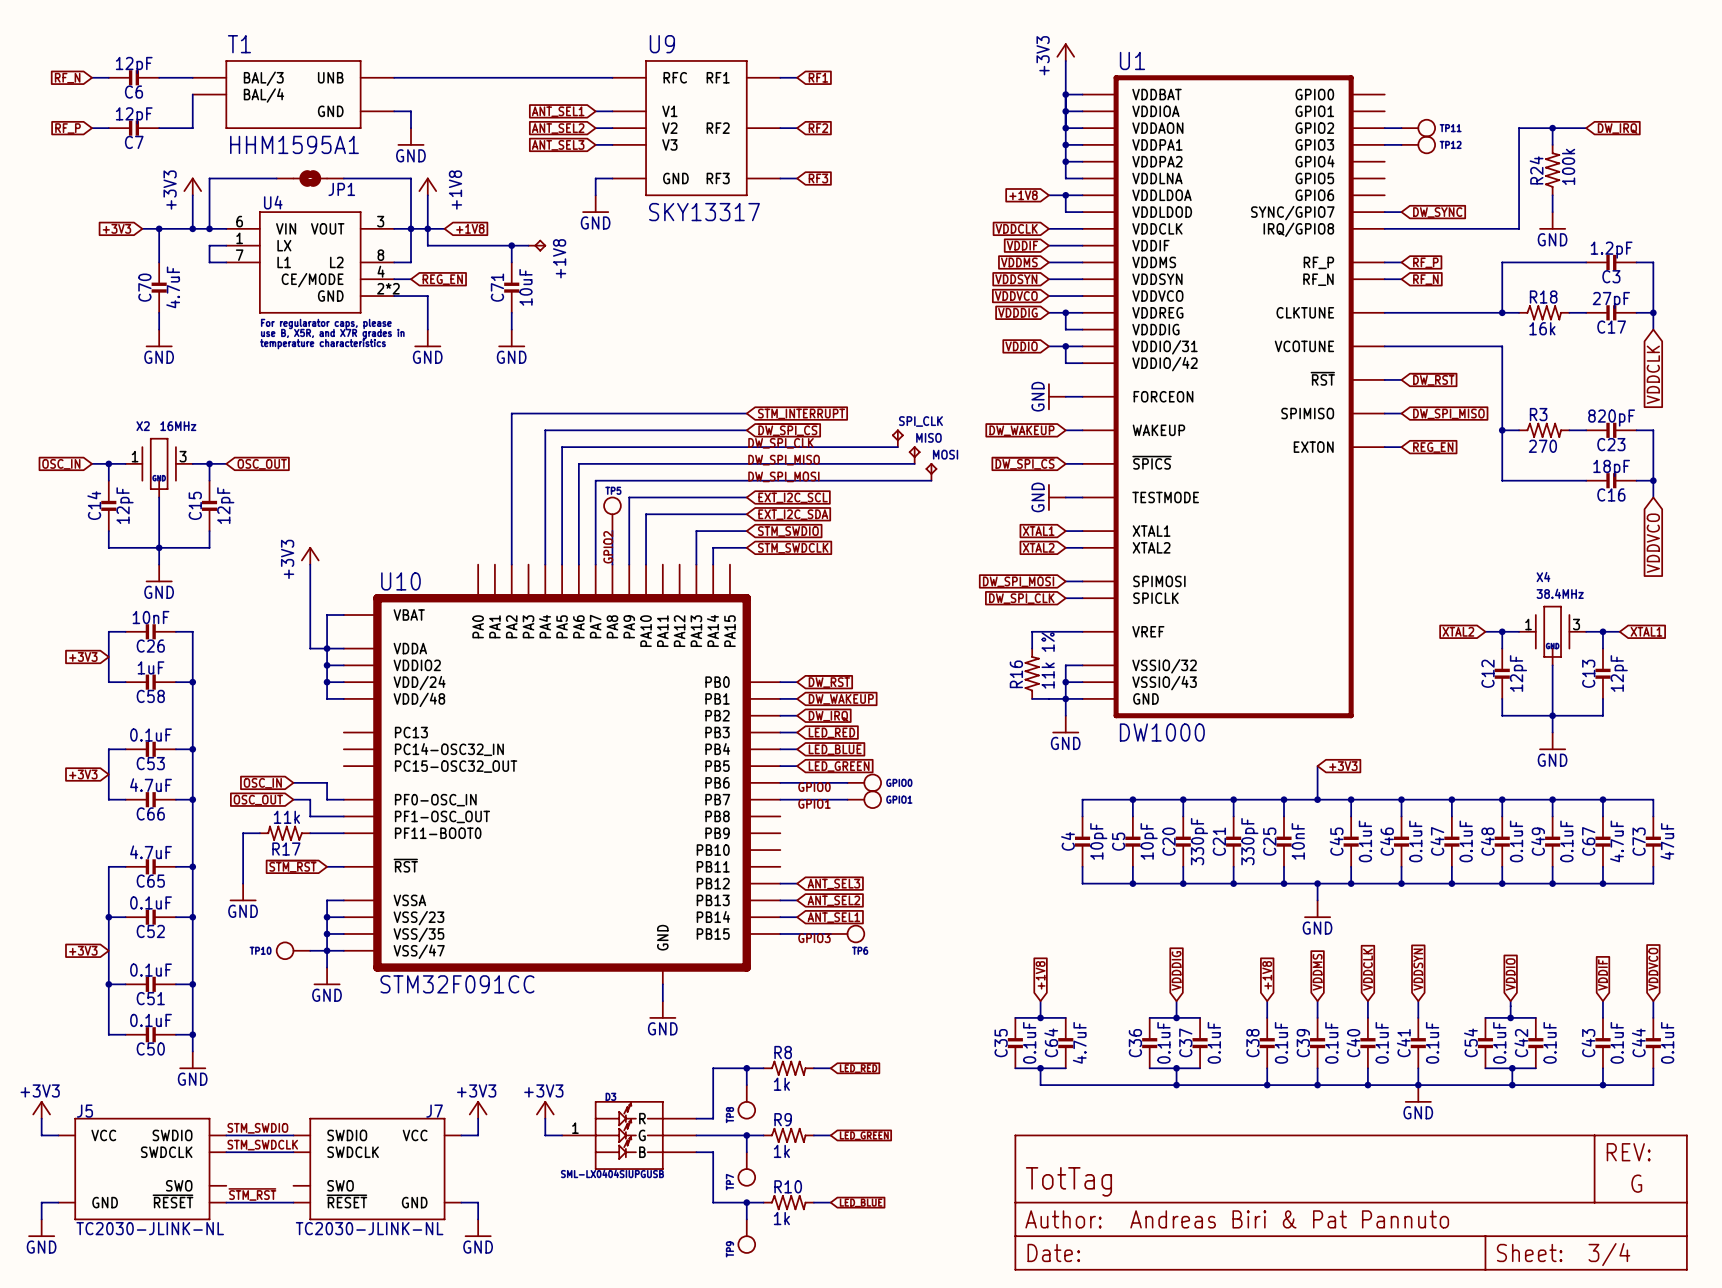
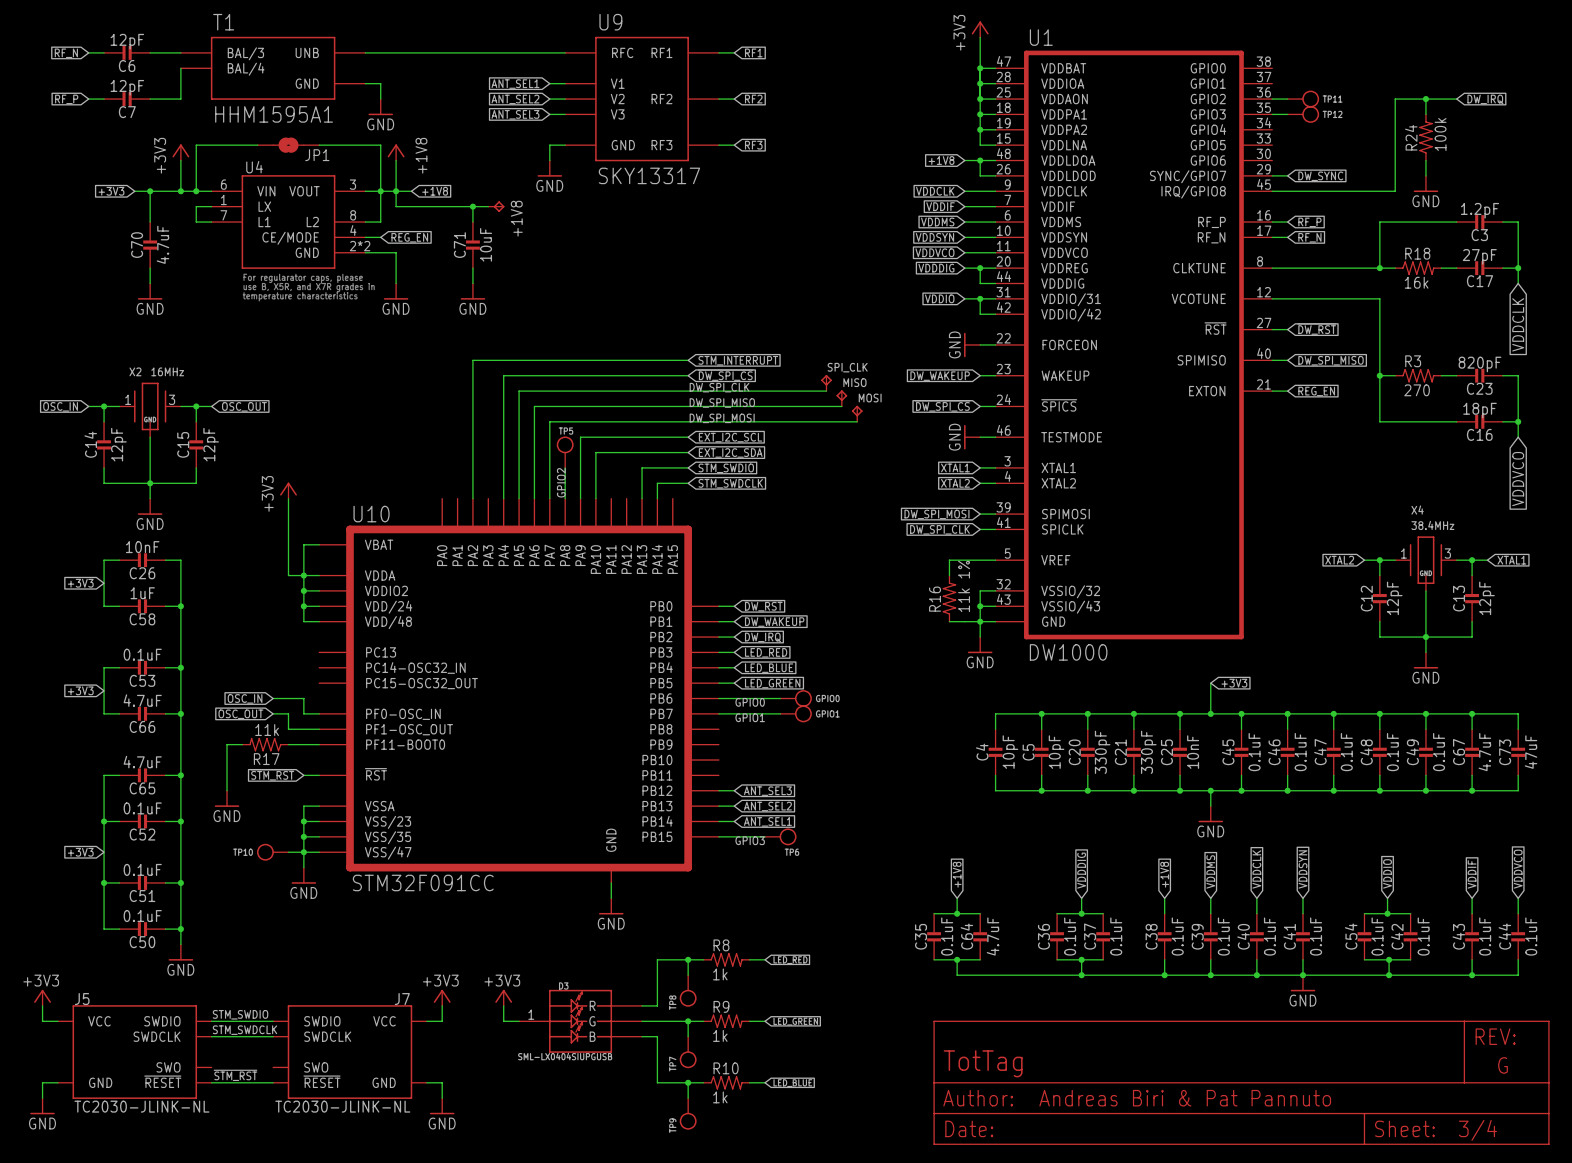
U1 symbol: [1082, 75, 1385, 719] -> [995, 50, 1273, 640]

